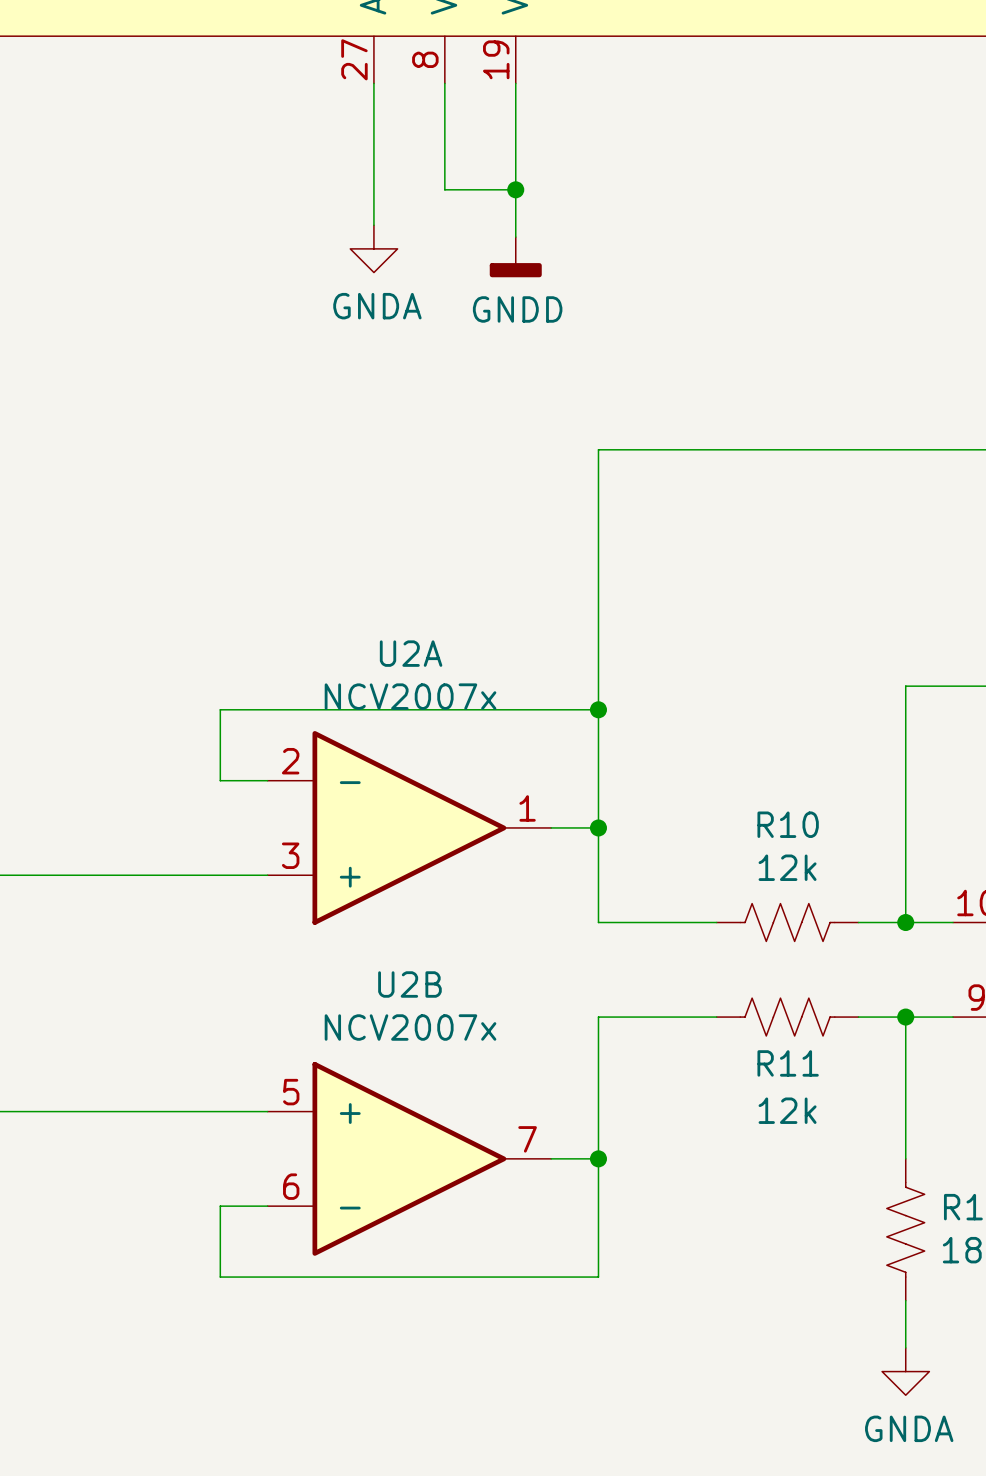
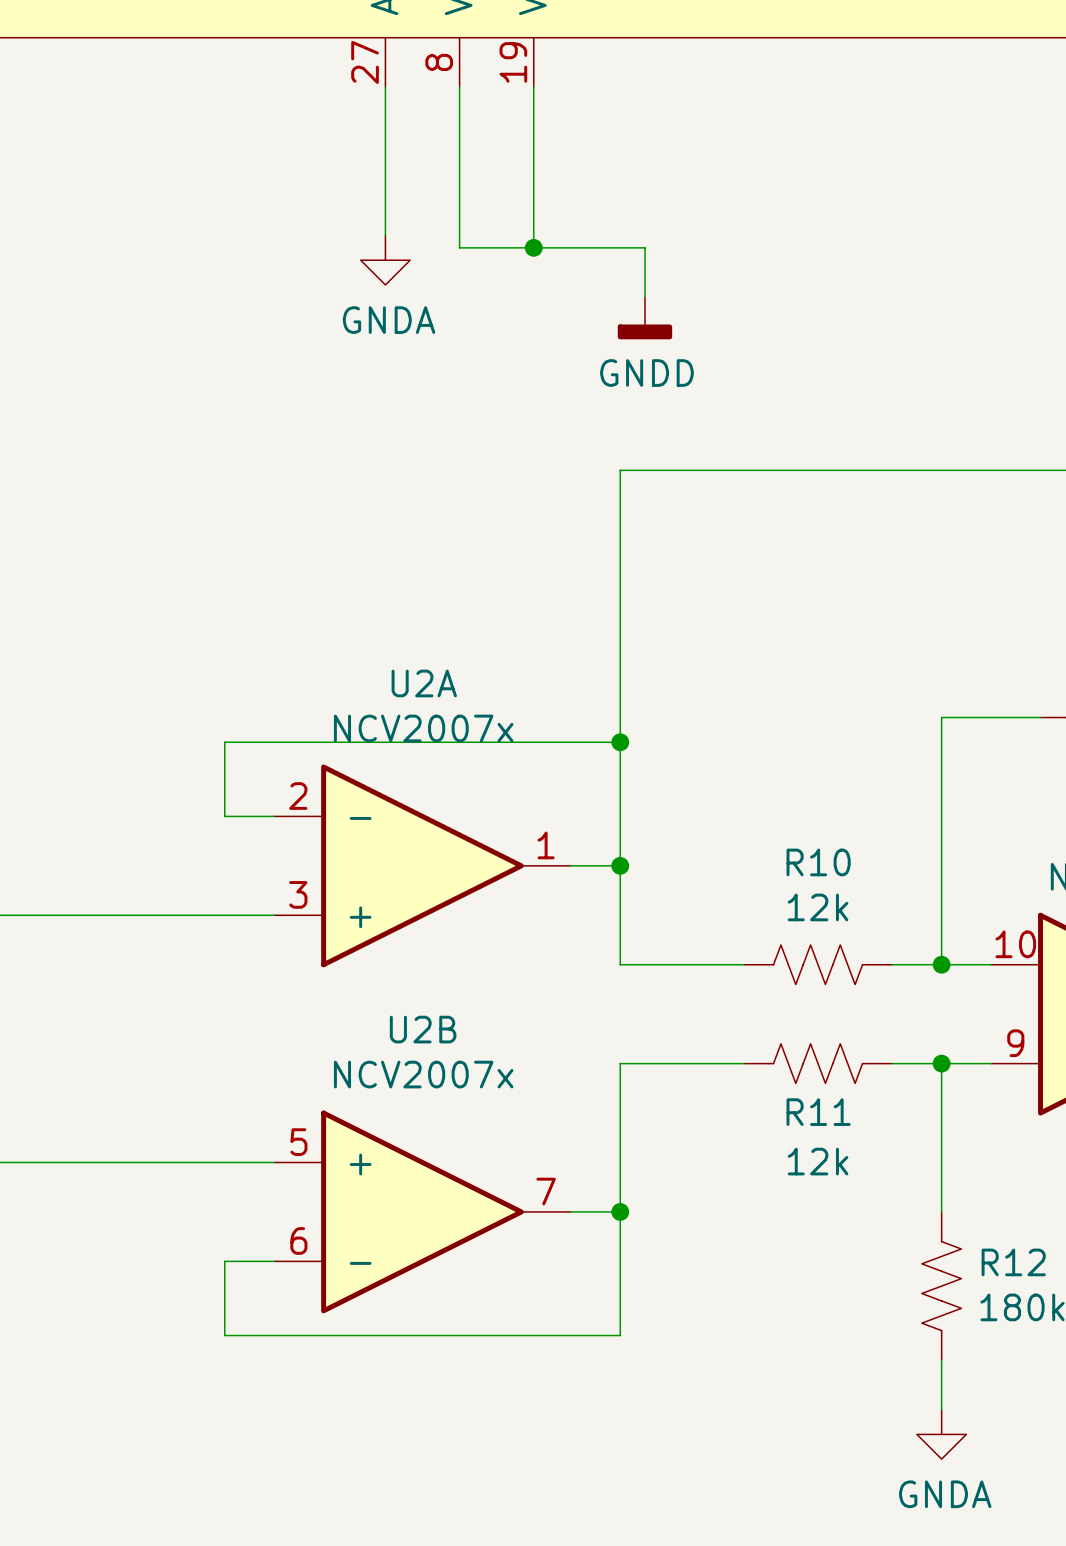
wire: (444, 189) (515, 189) -> (459, 198) (459, 247) (644, 247) (644, 297)
junction position: (515, 189) -> (533, 247)
power symbol position: GNDD (515, 257) -> GNDD (644, 318)

